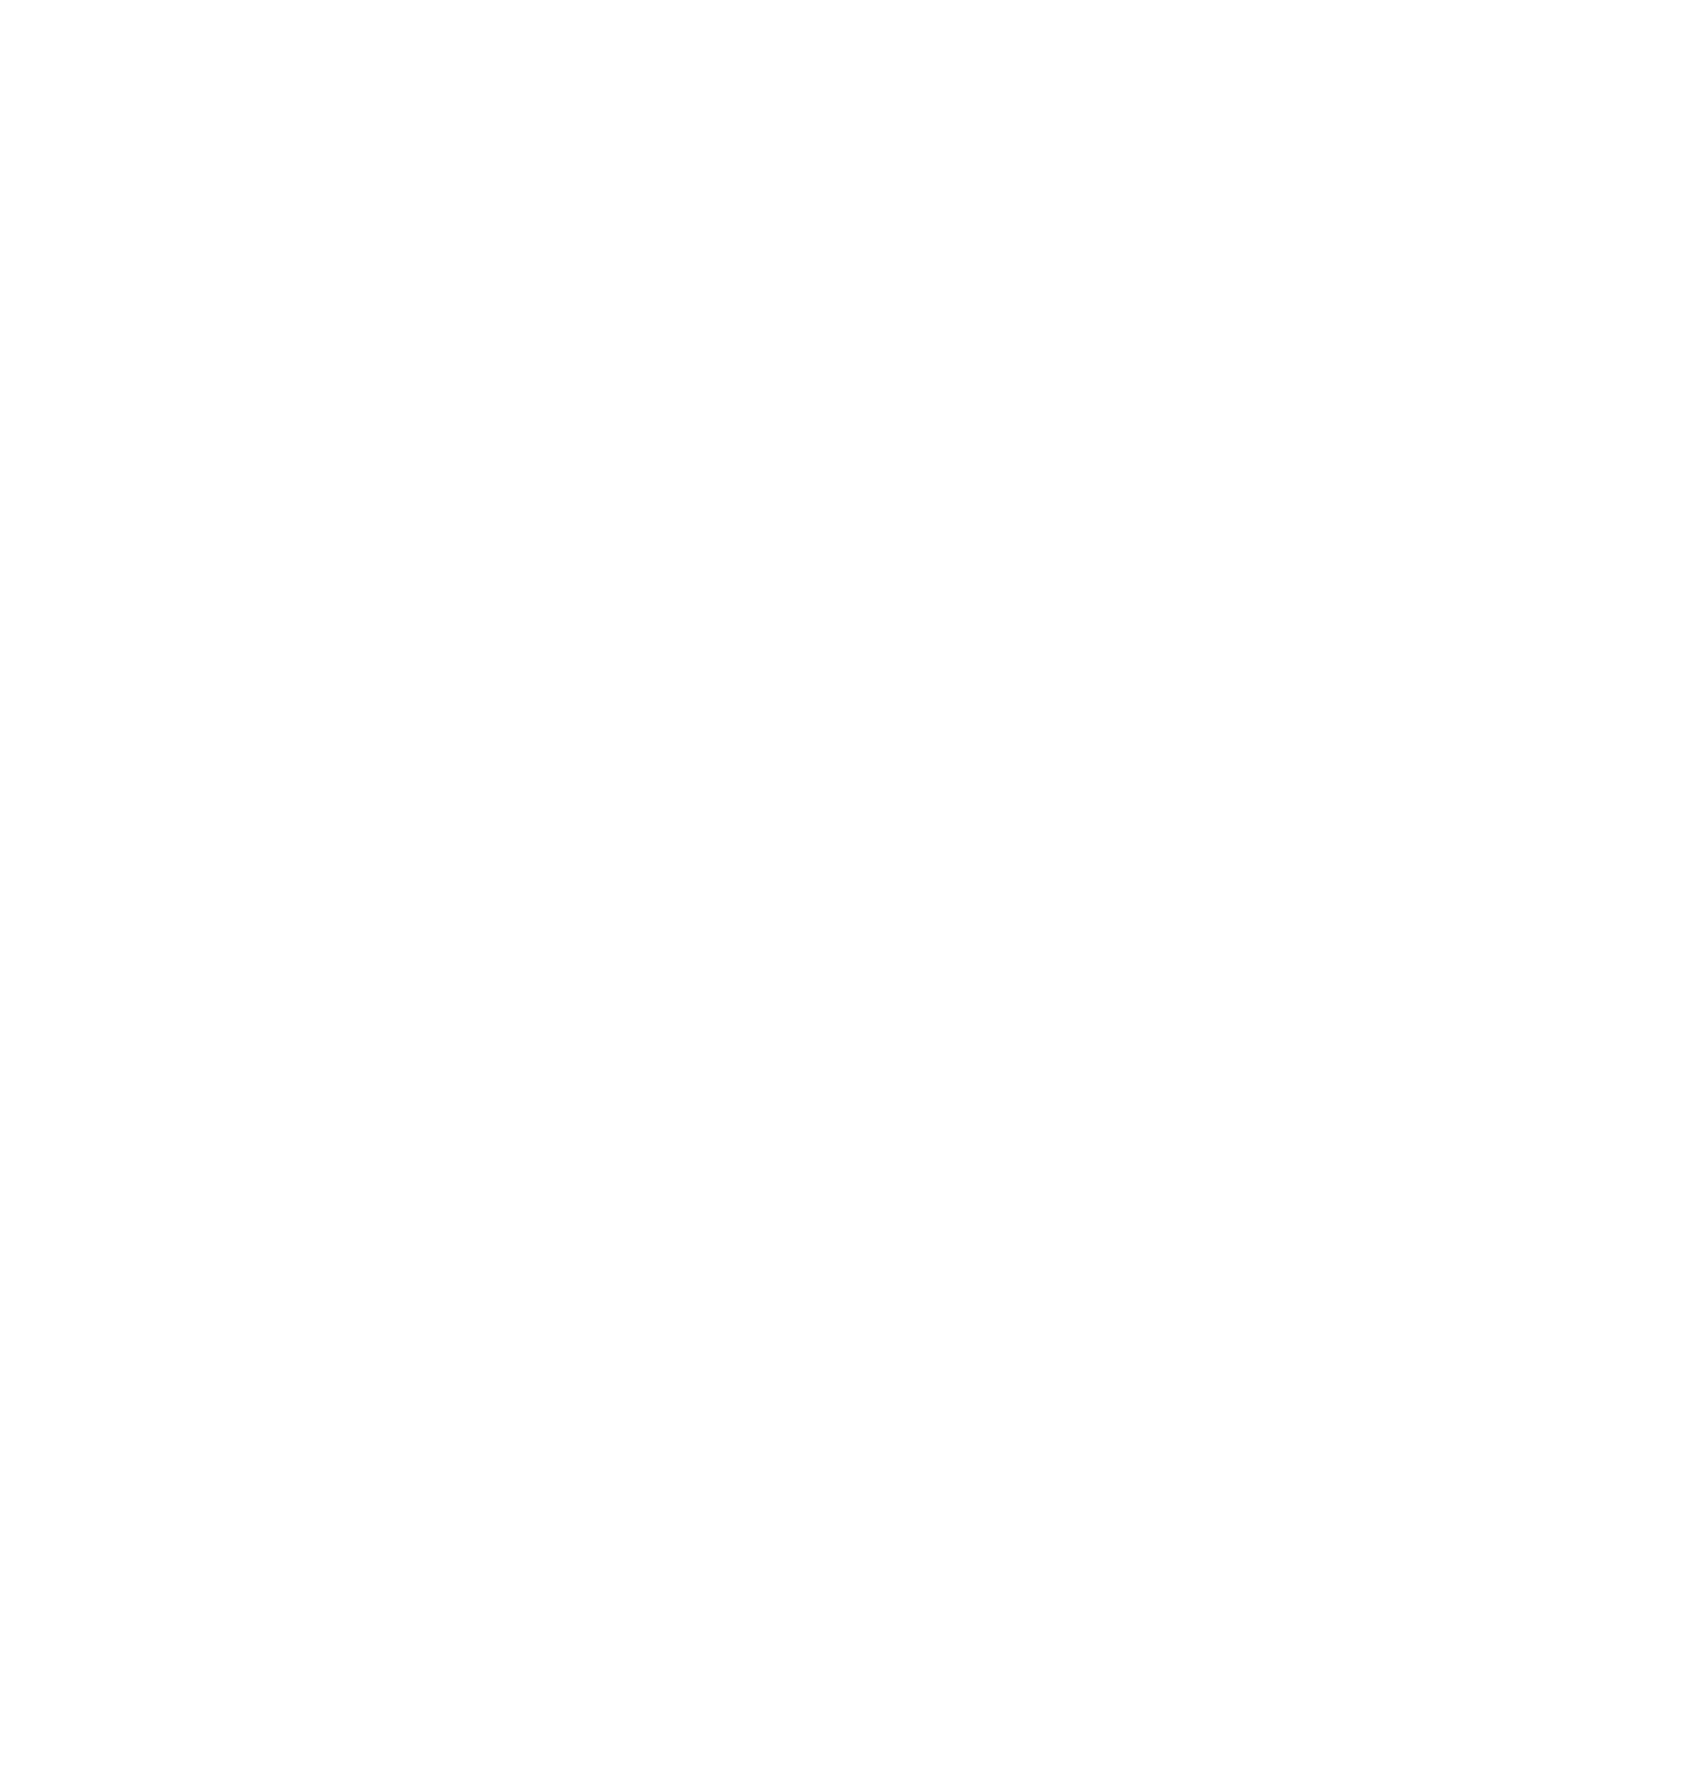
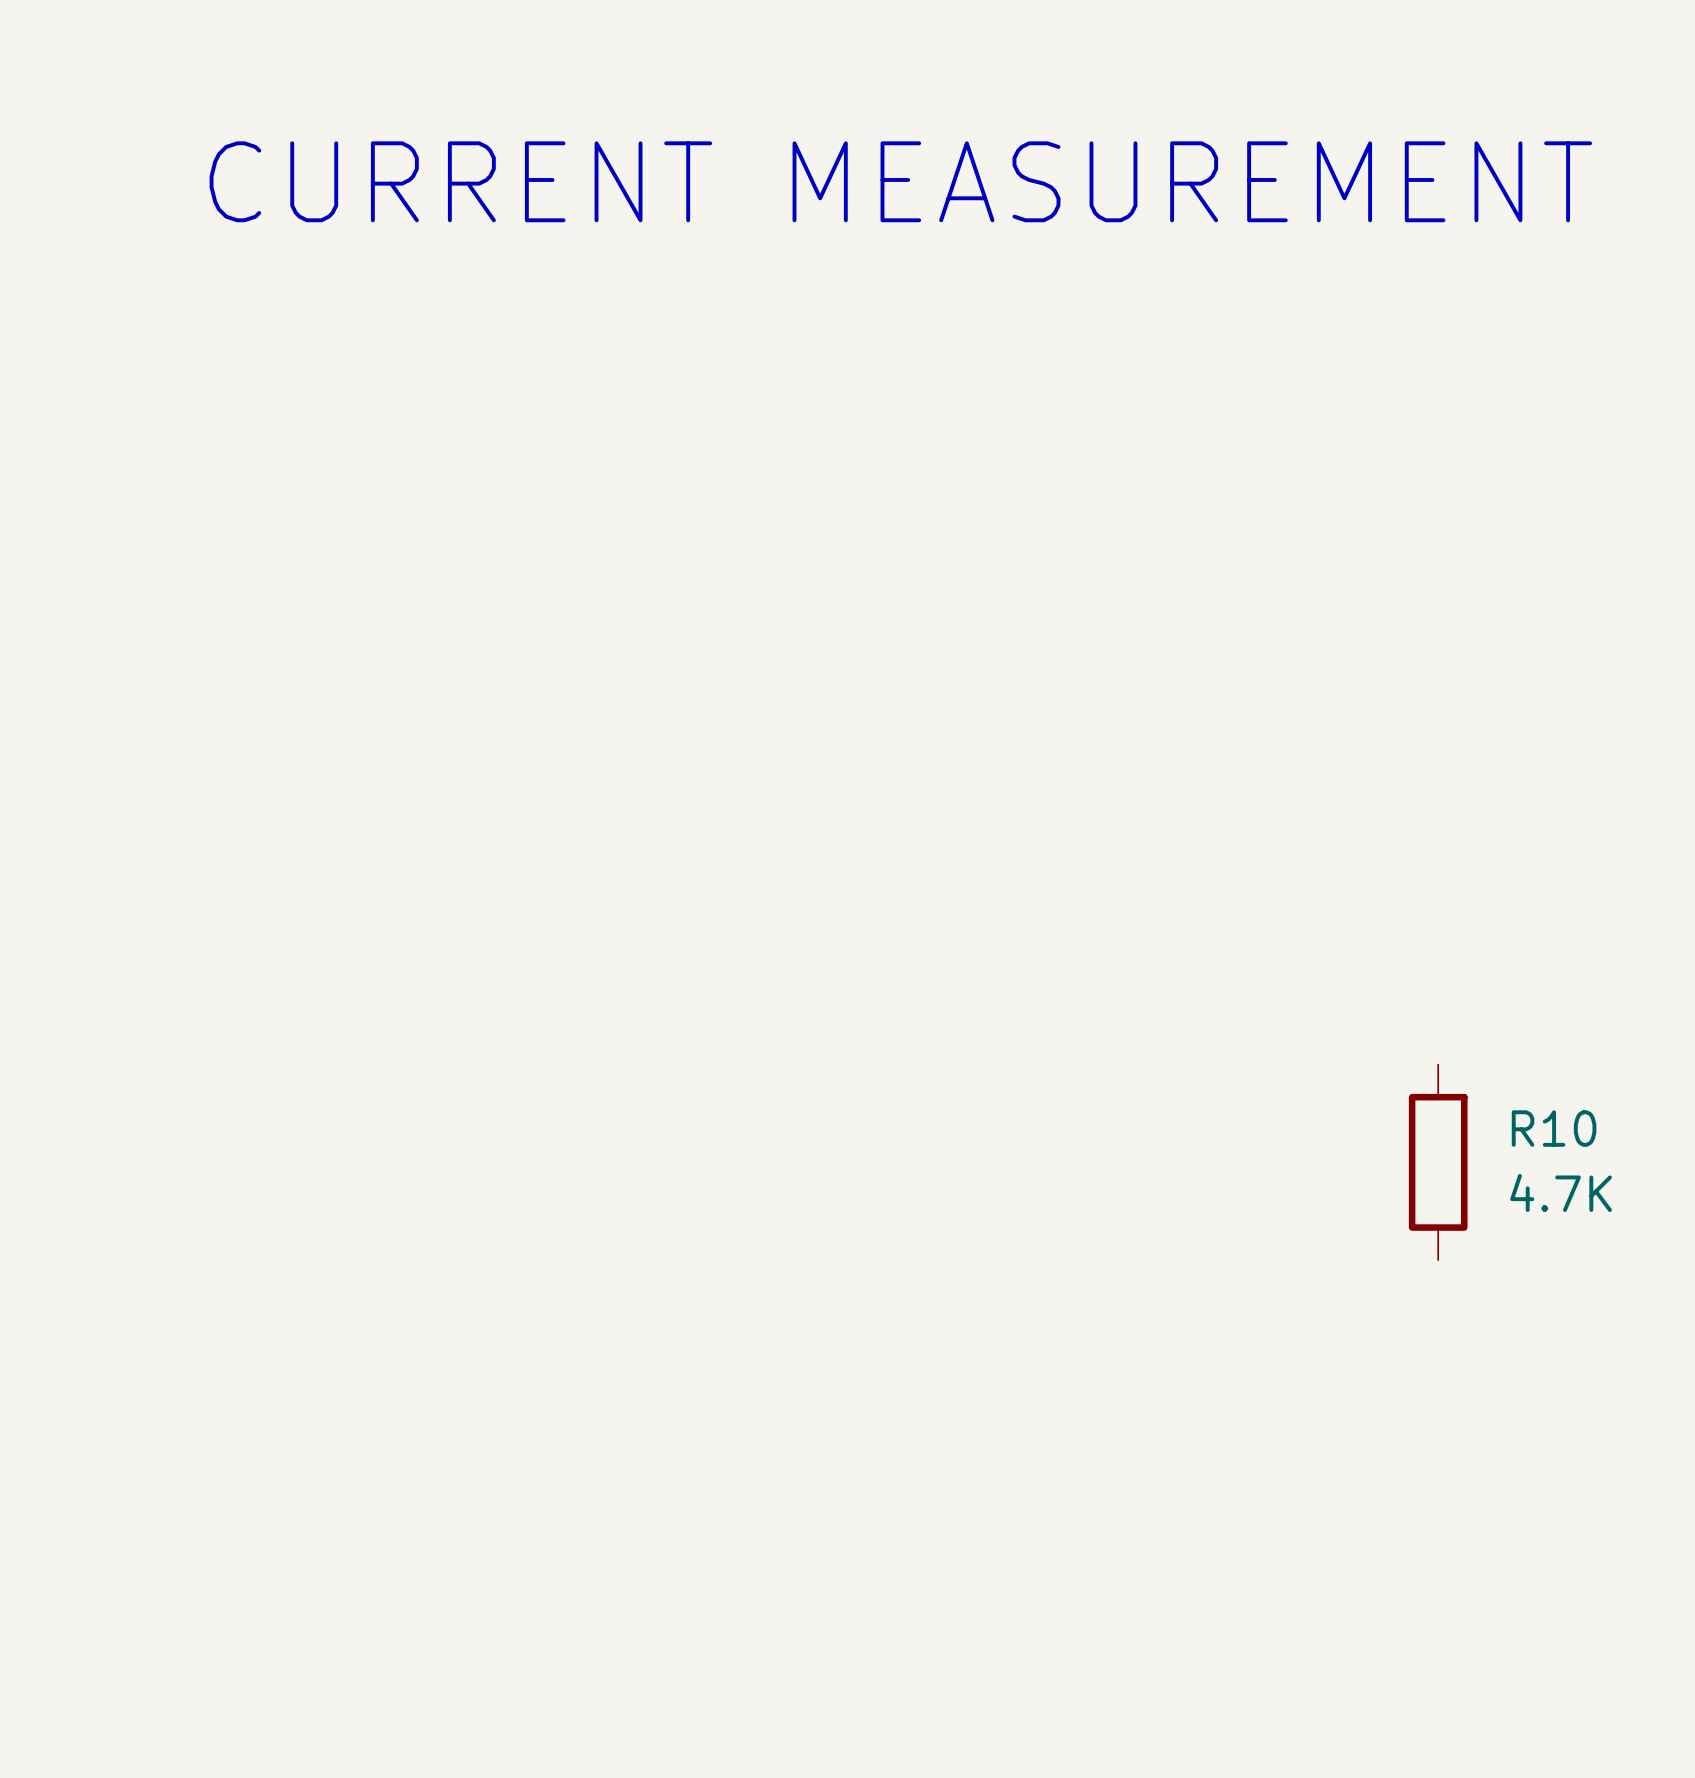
text: none -> CURRENT MEASUREMENT (900, 181)
R10: none -> 4.7K (1438, 1162)

